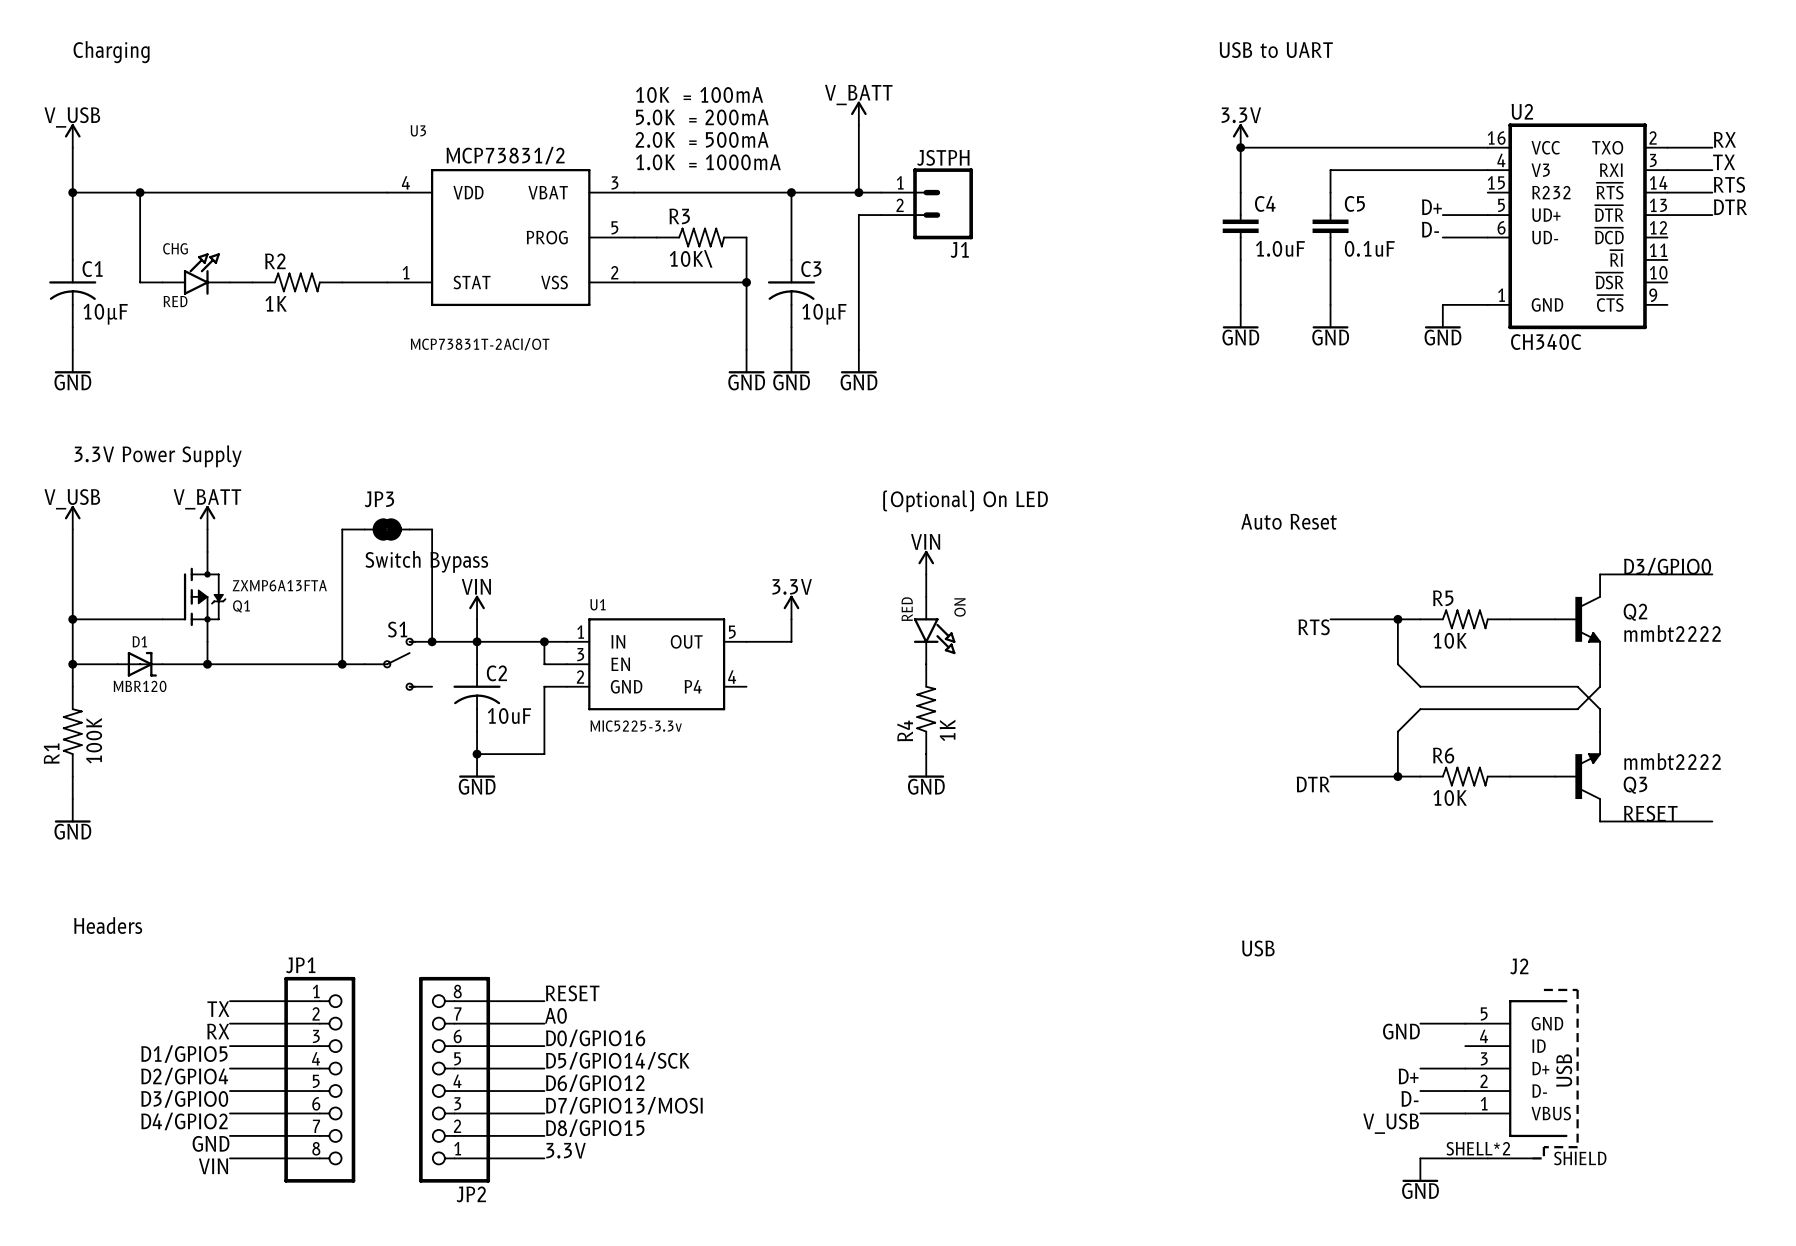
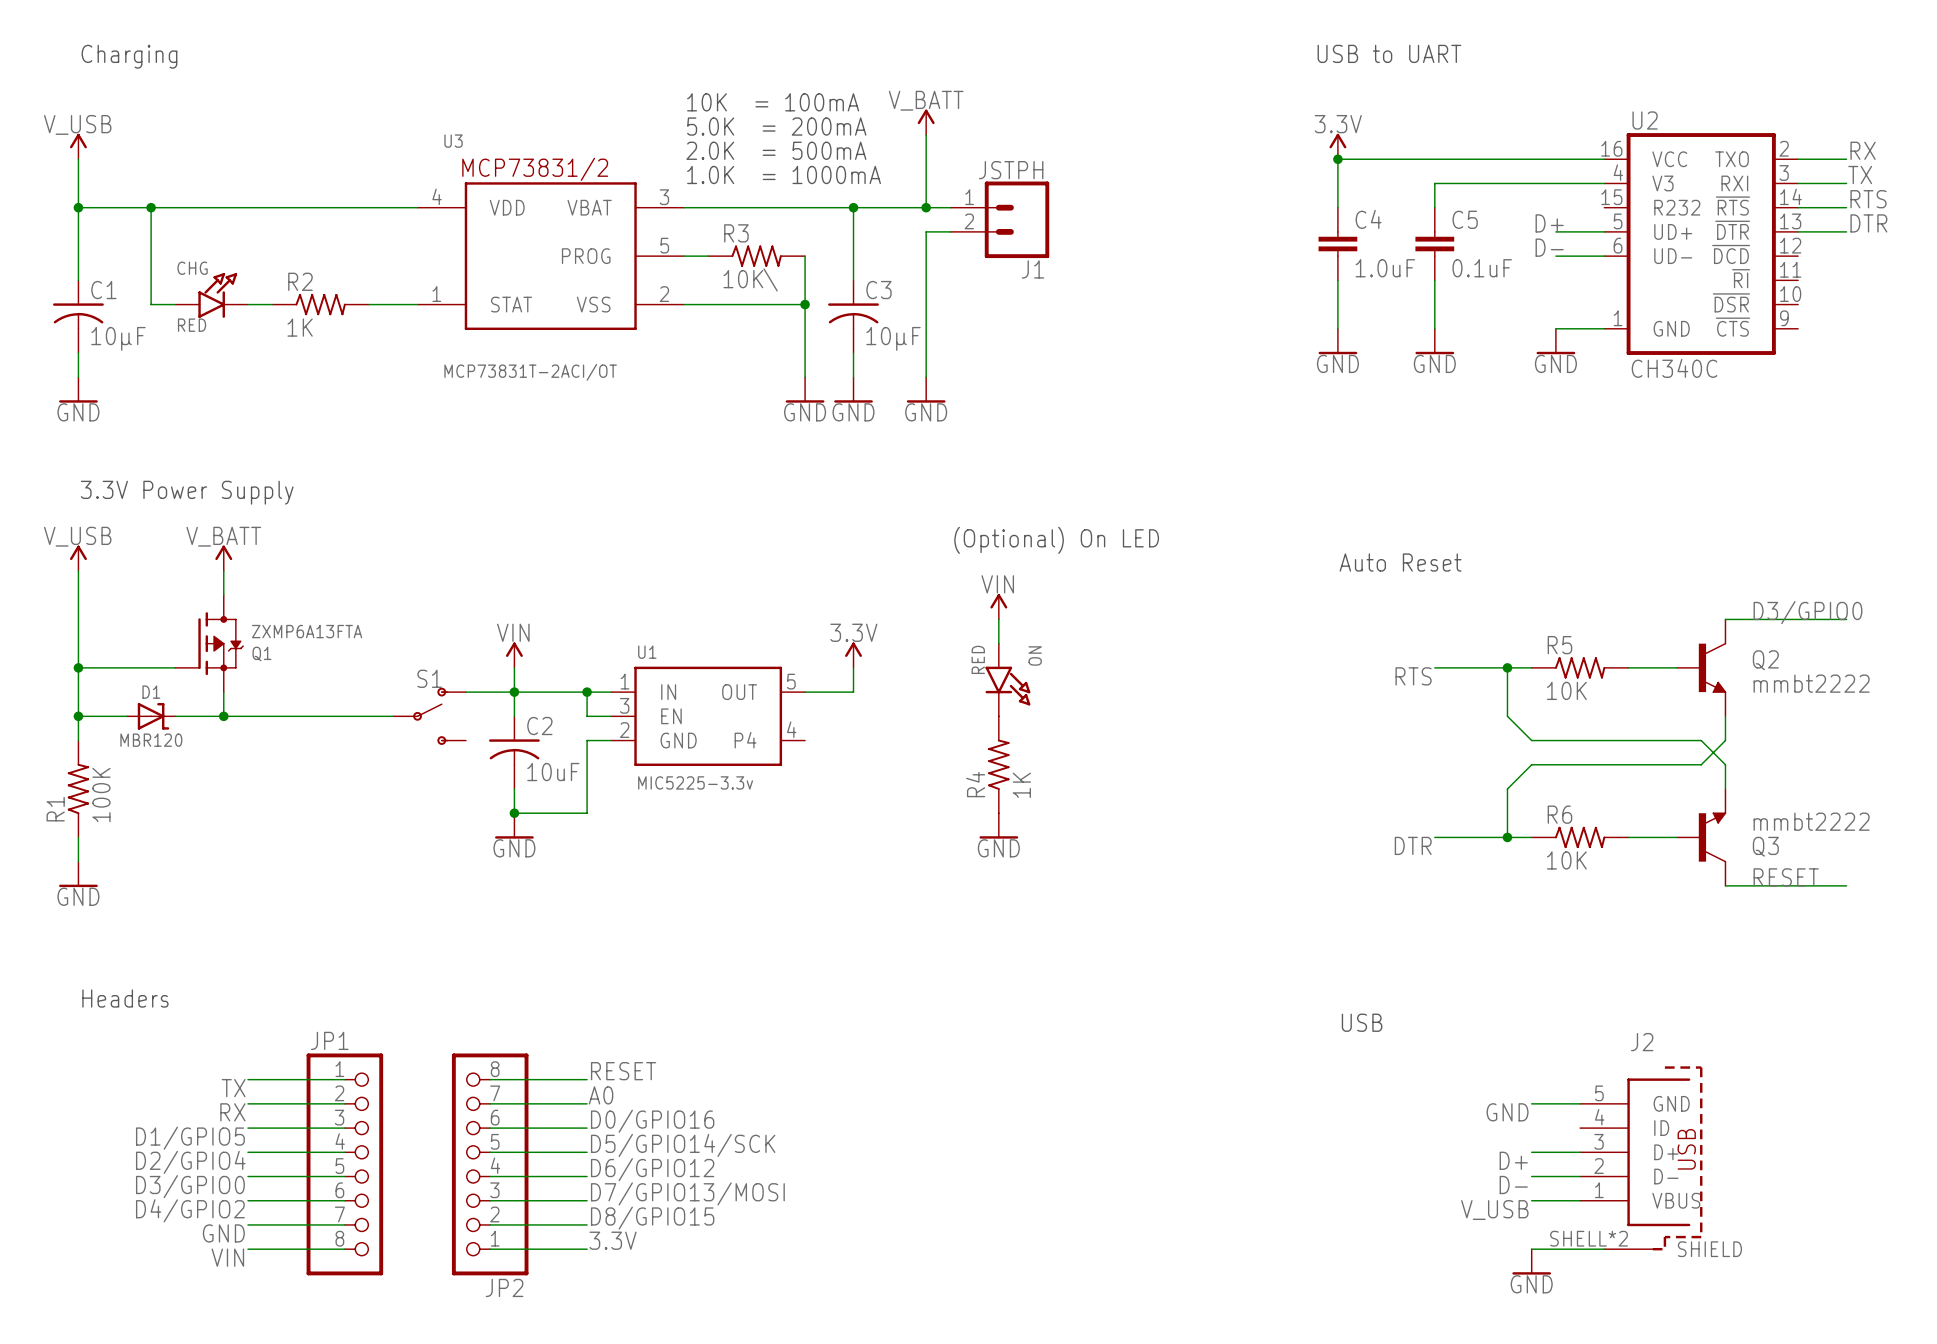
wire: (342, 529) (342, 664) -> none
JP3: Switch Bypass (387, 529) -> none
wire: (432, 529) (432, 641) -> none
junction: (432, 641) -> none
junction: (342, 664) -> none

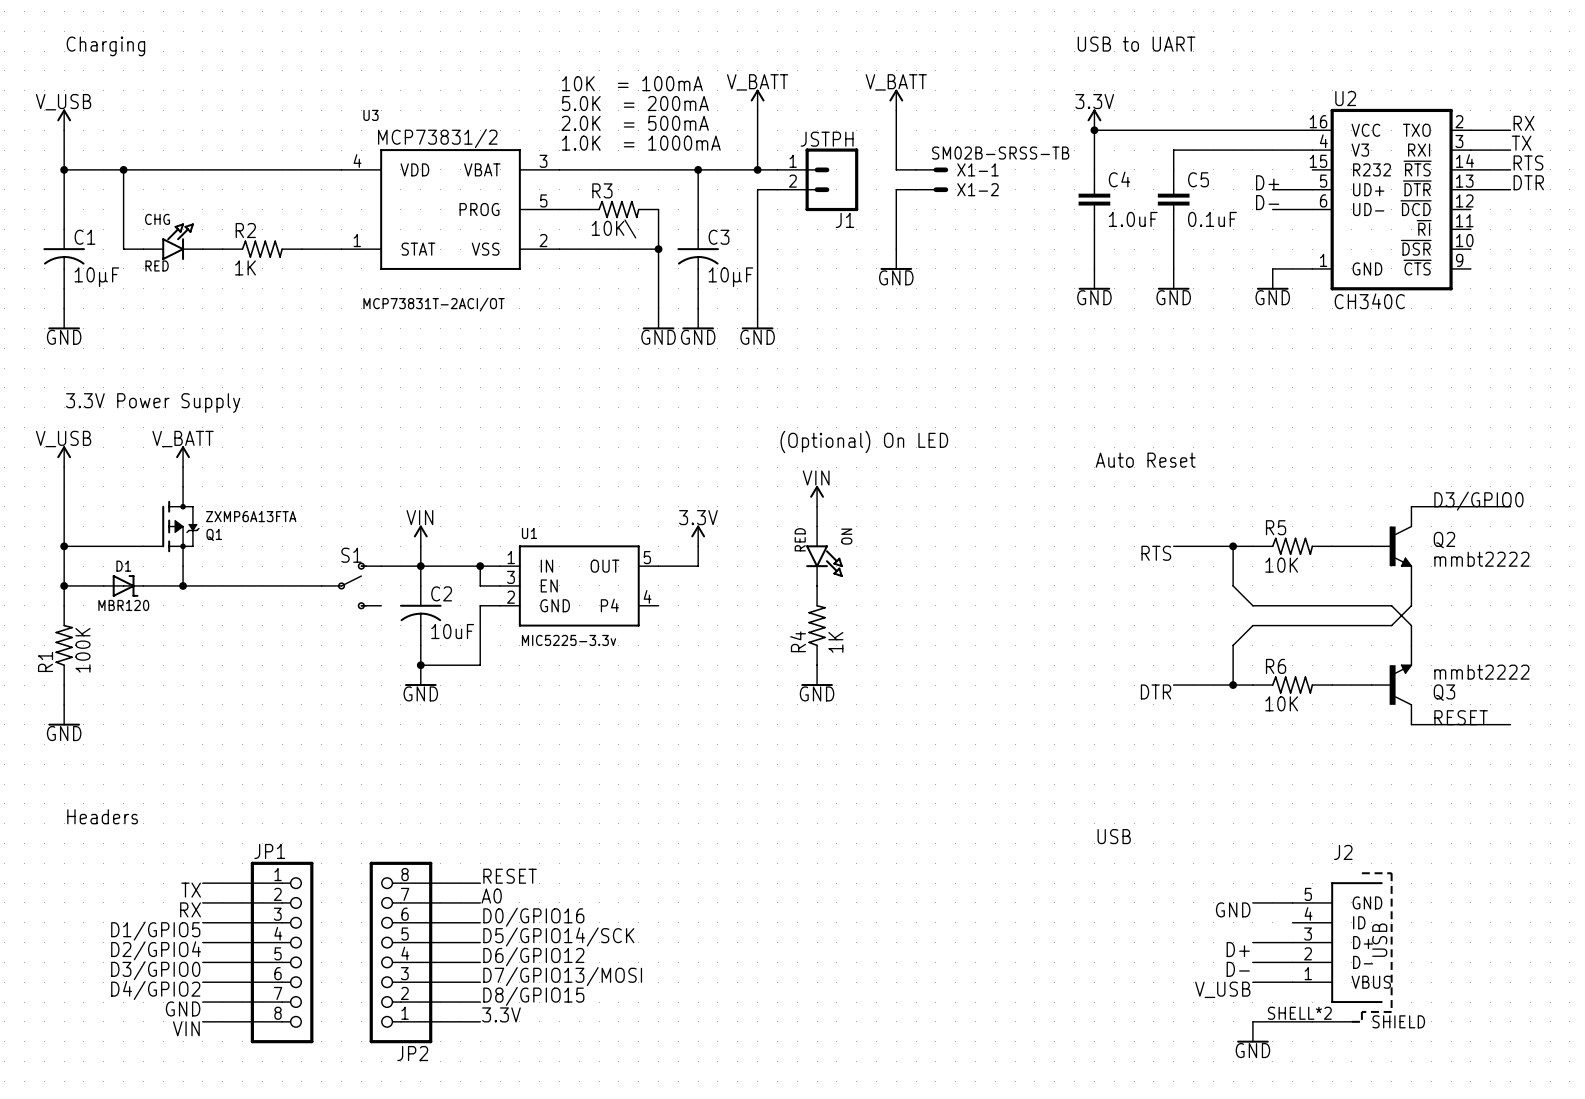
power symbol: none -> V_BATT (896, 100)
wire: none -> (896, 110) (896, 169) (916, 169)
X1-1: none -> SM02B-SRSS-TB (932, 169)
wire: none -> (916, 189) (896, 189) (896, 249)
X1-2: none -> (932, 189)
power symbol: none -> GND (896, 259)

